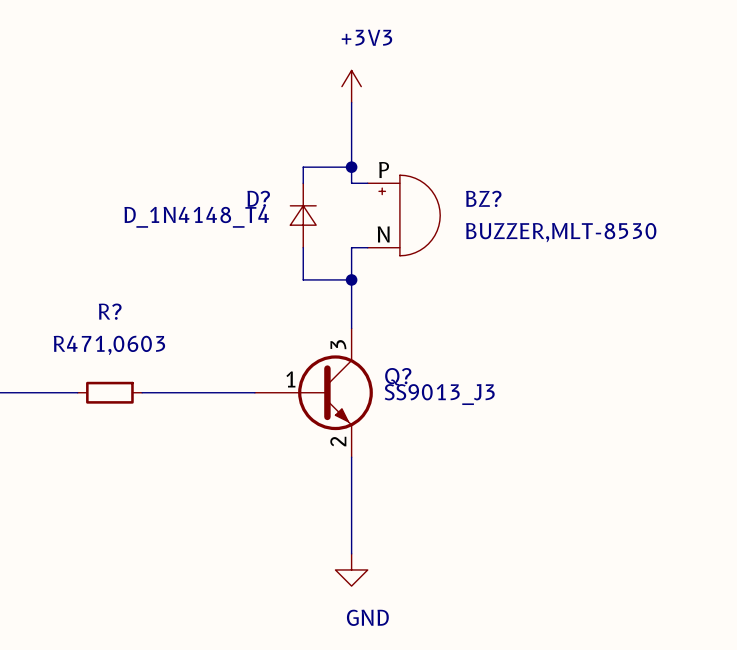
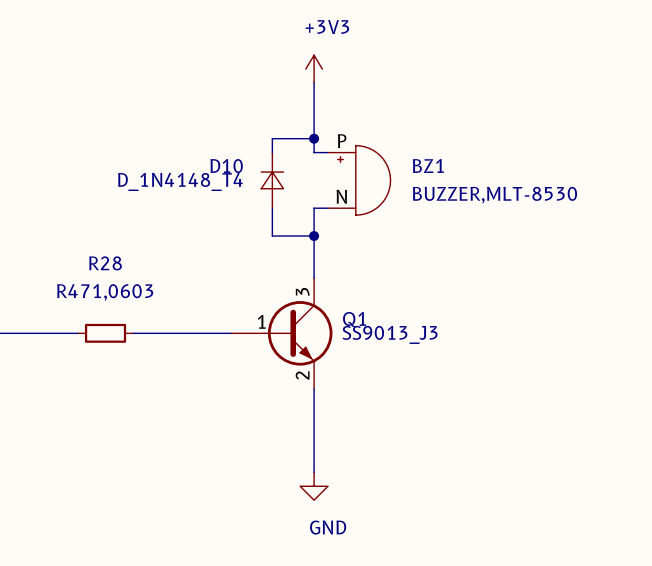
D? name: D? (258, 198) -> D10 (226, 166)
BZ? name: BZ? (483, 198) -> BZ1 (428, 165)
R? name: R? (110, 311) -> R28 (105, 263)
Q? name: Q? (398, 376) -> Q1 (354, 319)

